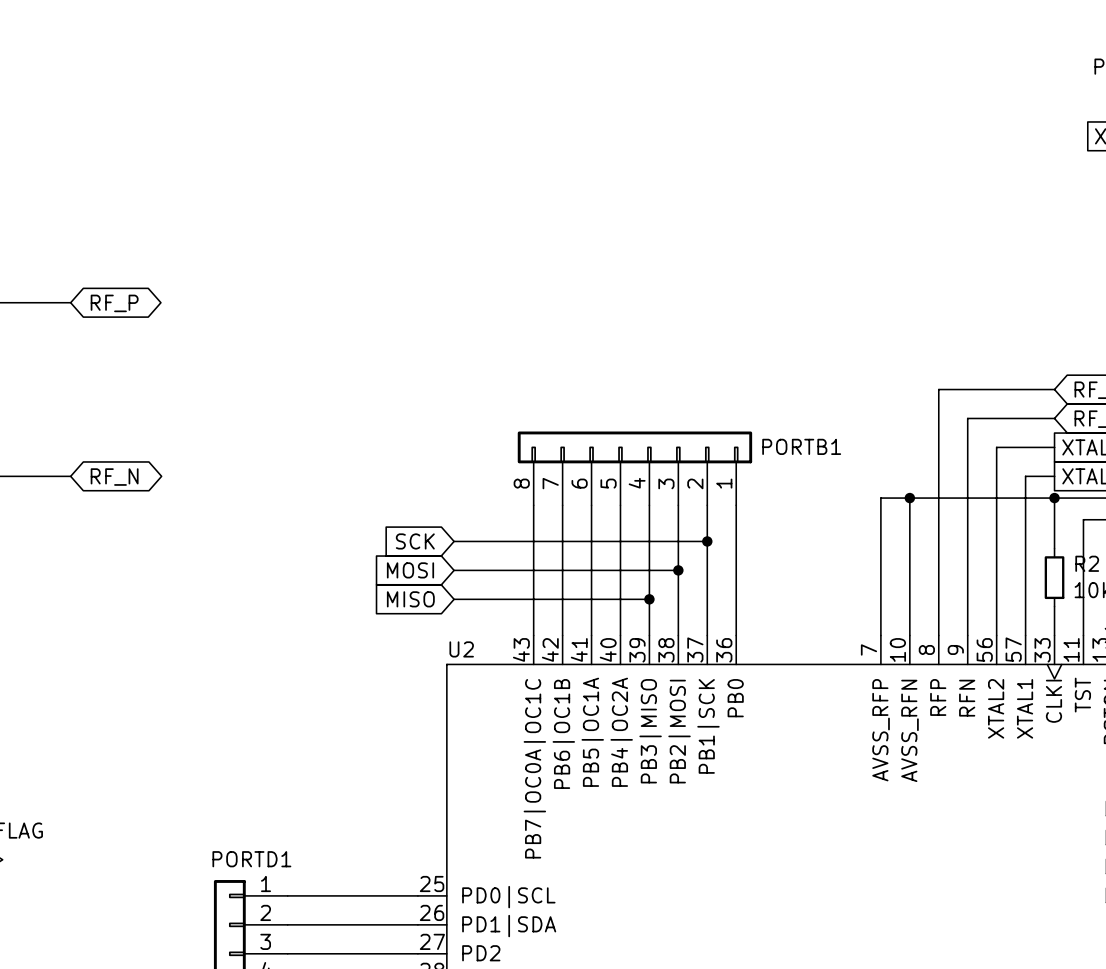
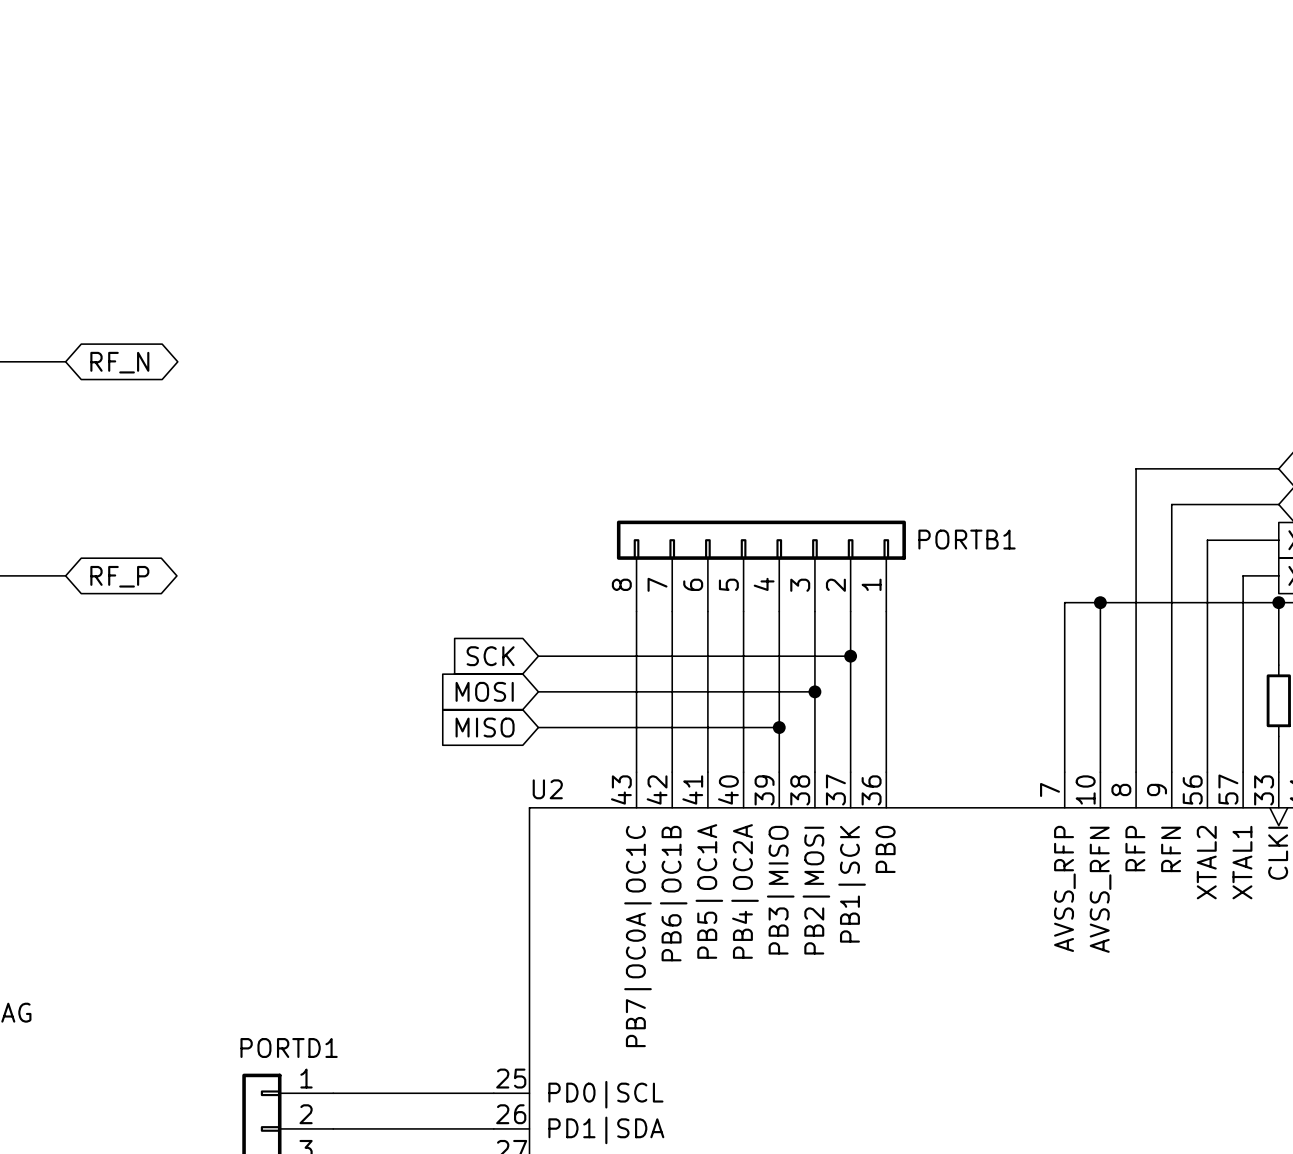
global label: RF_P (114, 303) -> RF_N (119, 362)
global label: RF_N (114, 477) -> RF_P (119, 576)

